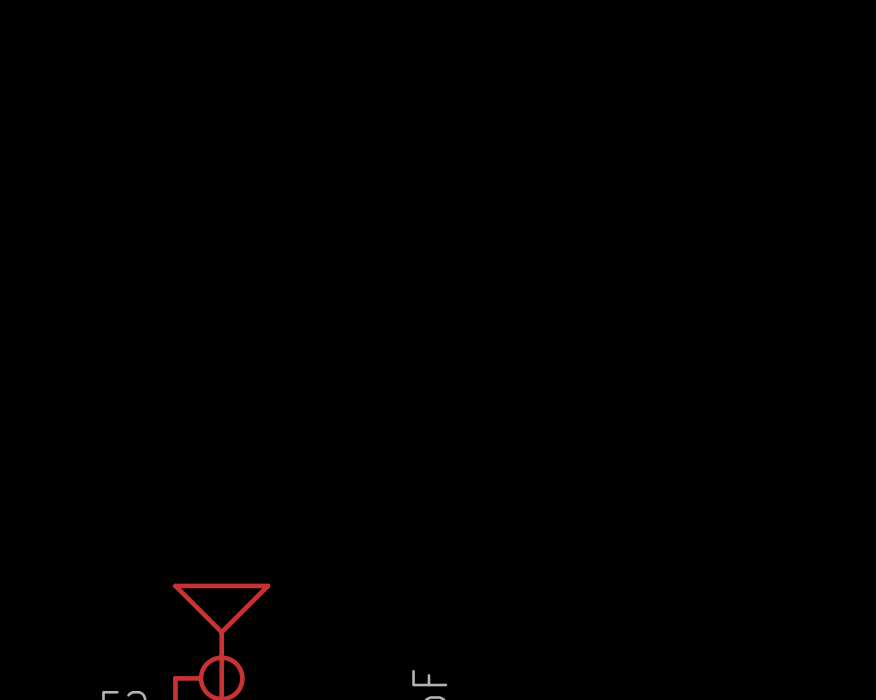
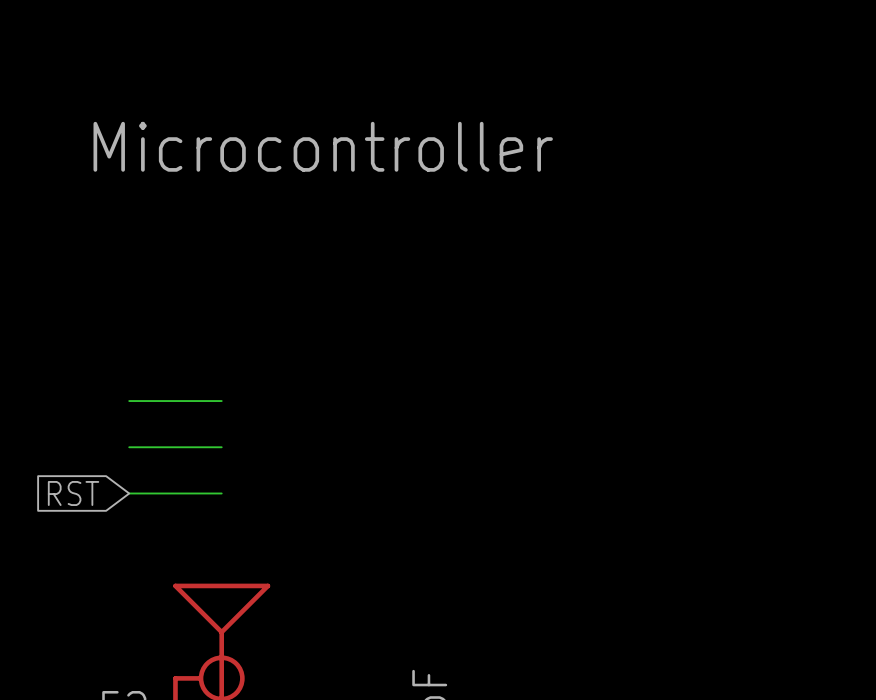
text: none -> Microcontroller (323, 146)
wire: none -> (129, 401) (221, 401)
wire: none -> (129, 447) (221, 447)
global label: none -> RST (73, 493)
wire: none -> (129, 493) (221, 493)

